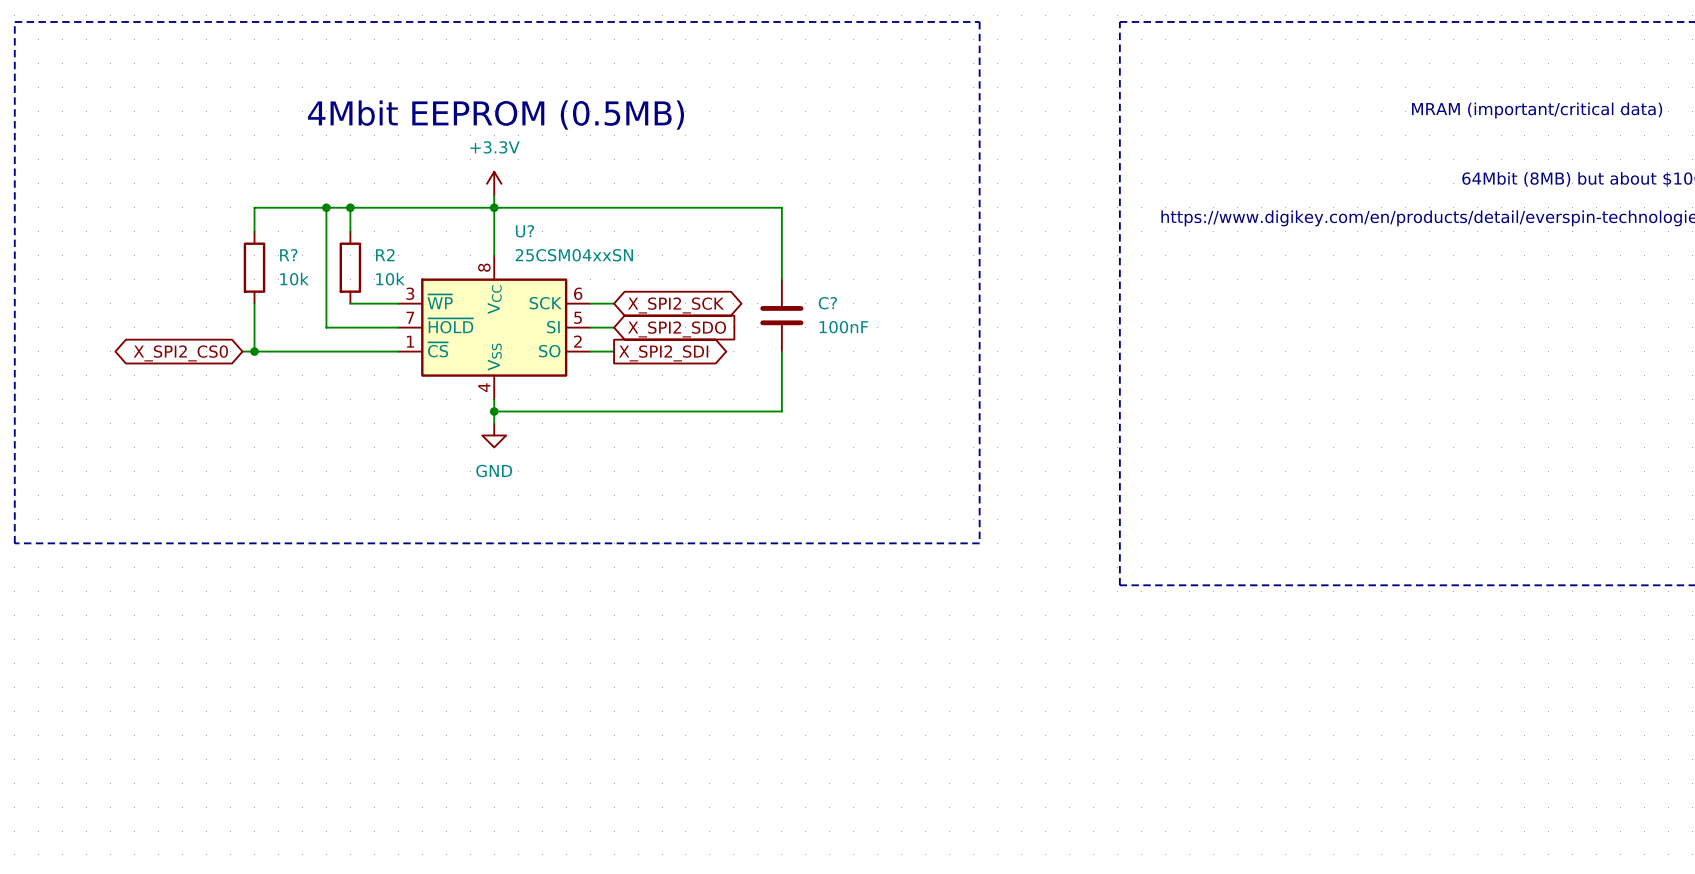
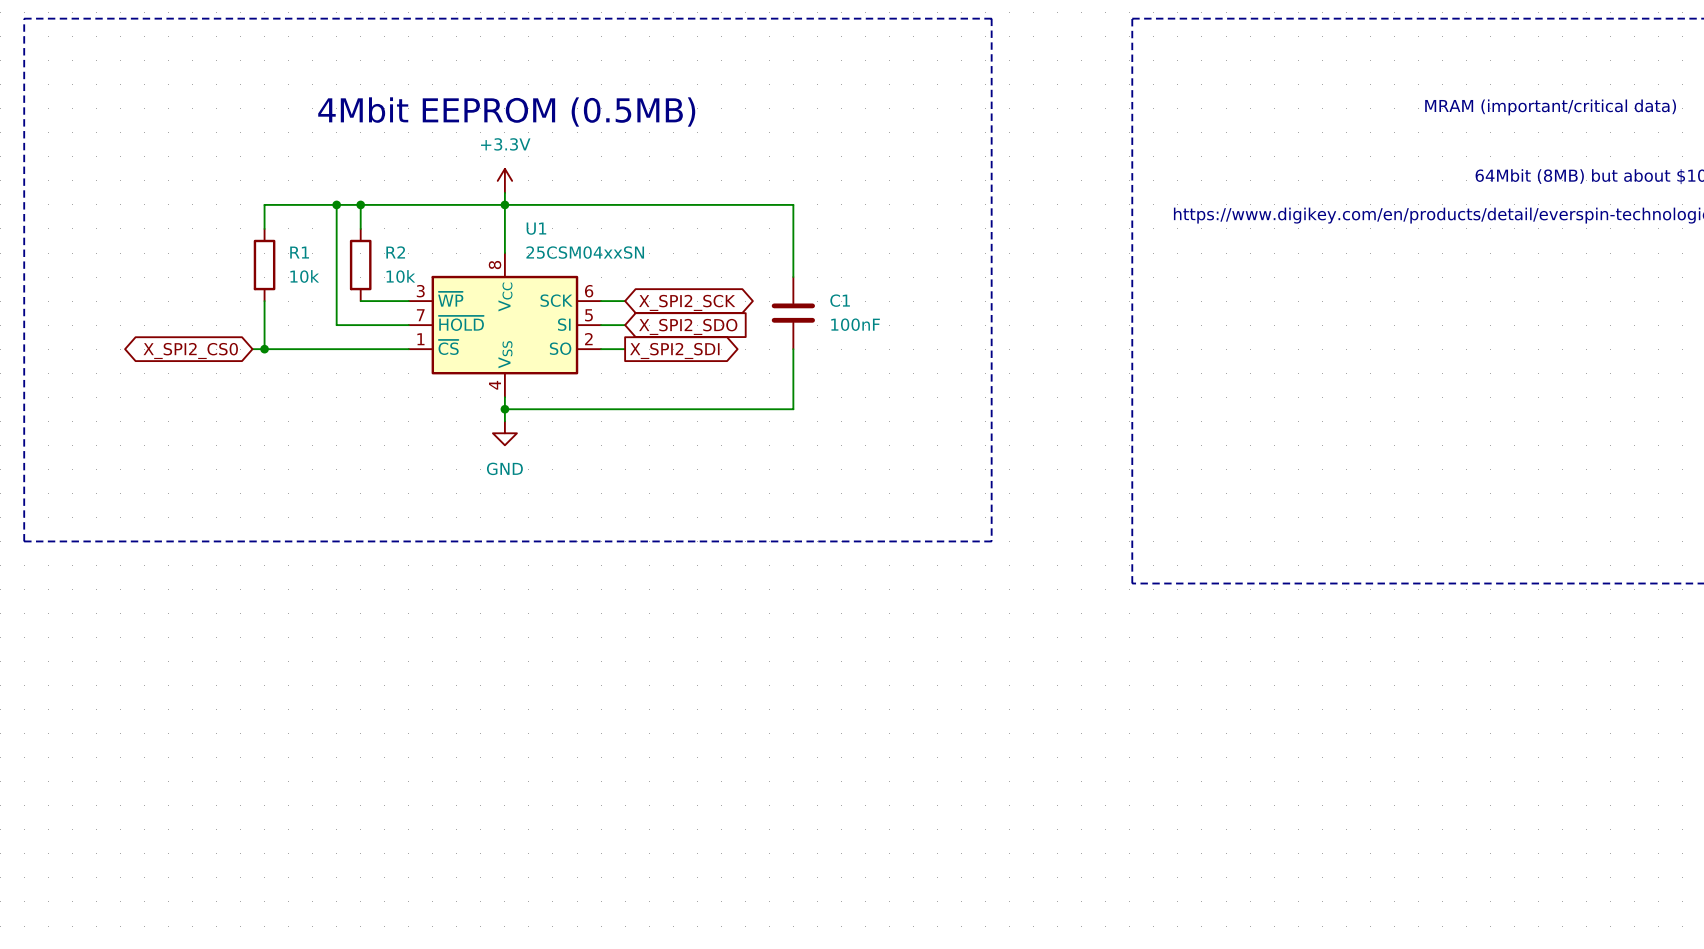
U? name: U? (524, 231) -> U1 (536, 228)
R? name: R? (288, 255) -> R1 (299, 252)
C? name: C? (827, 303) -> C1 (840, 300)

